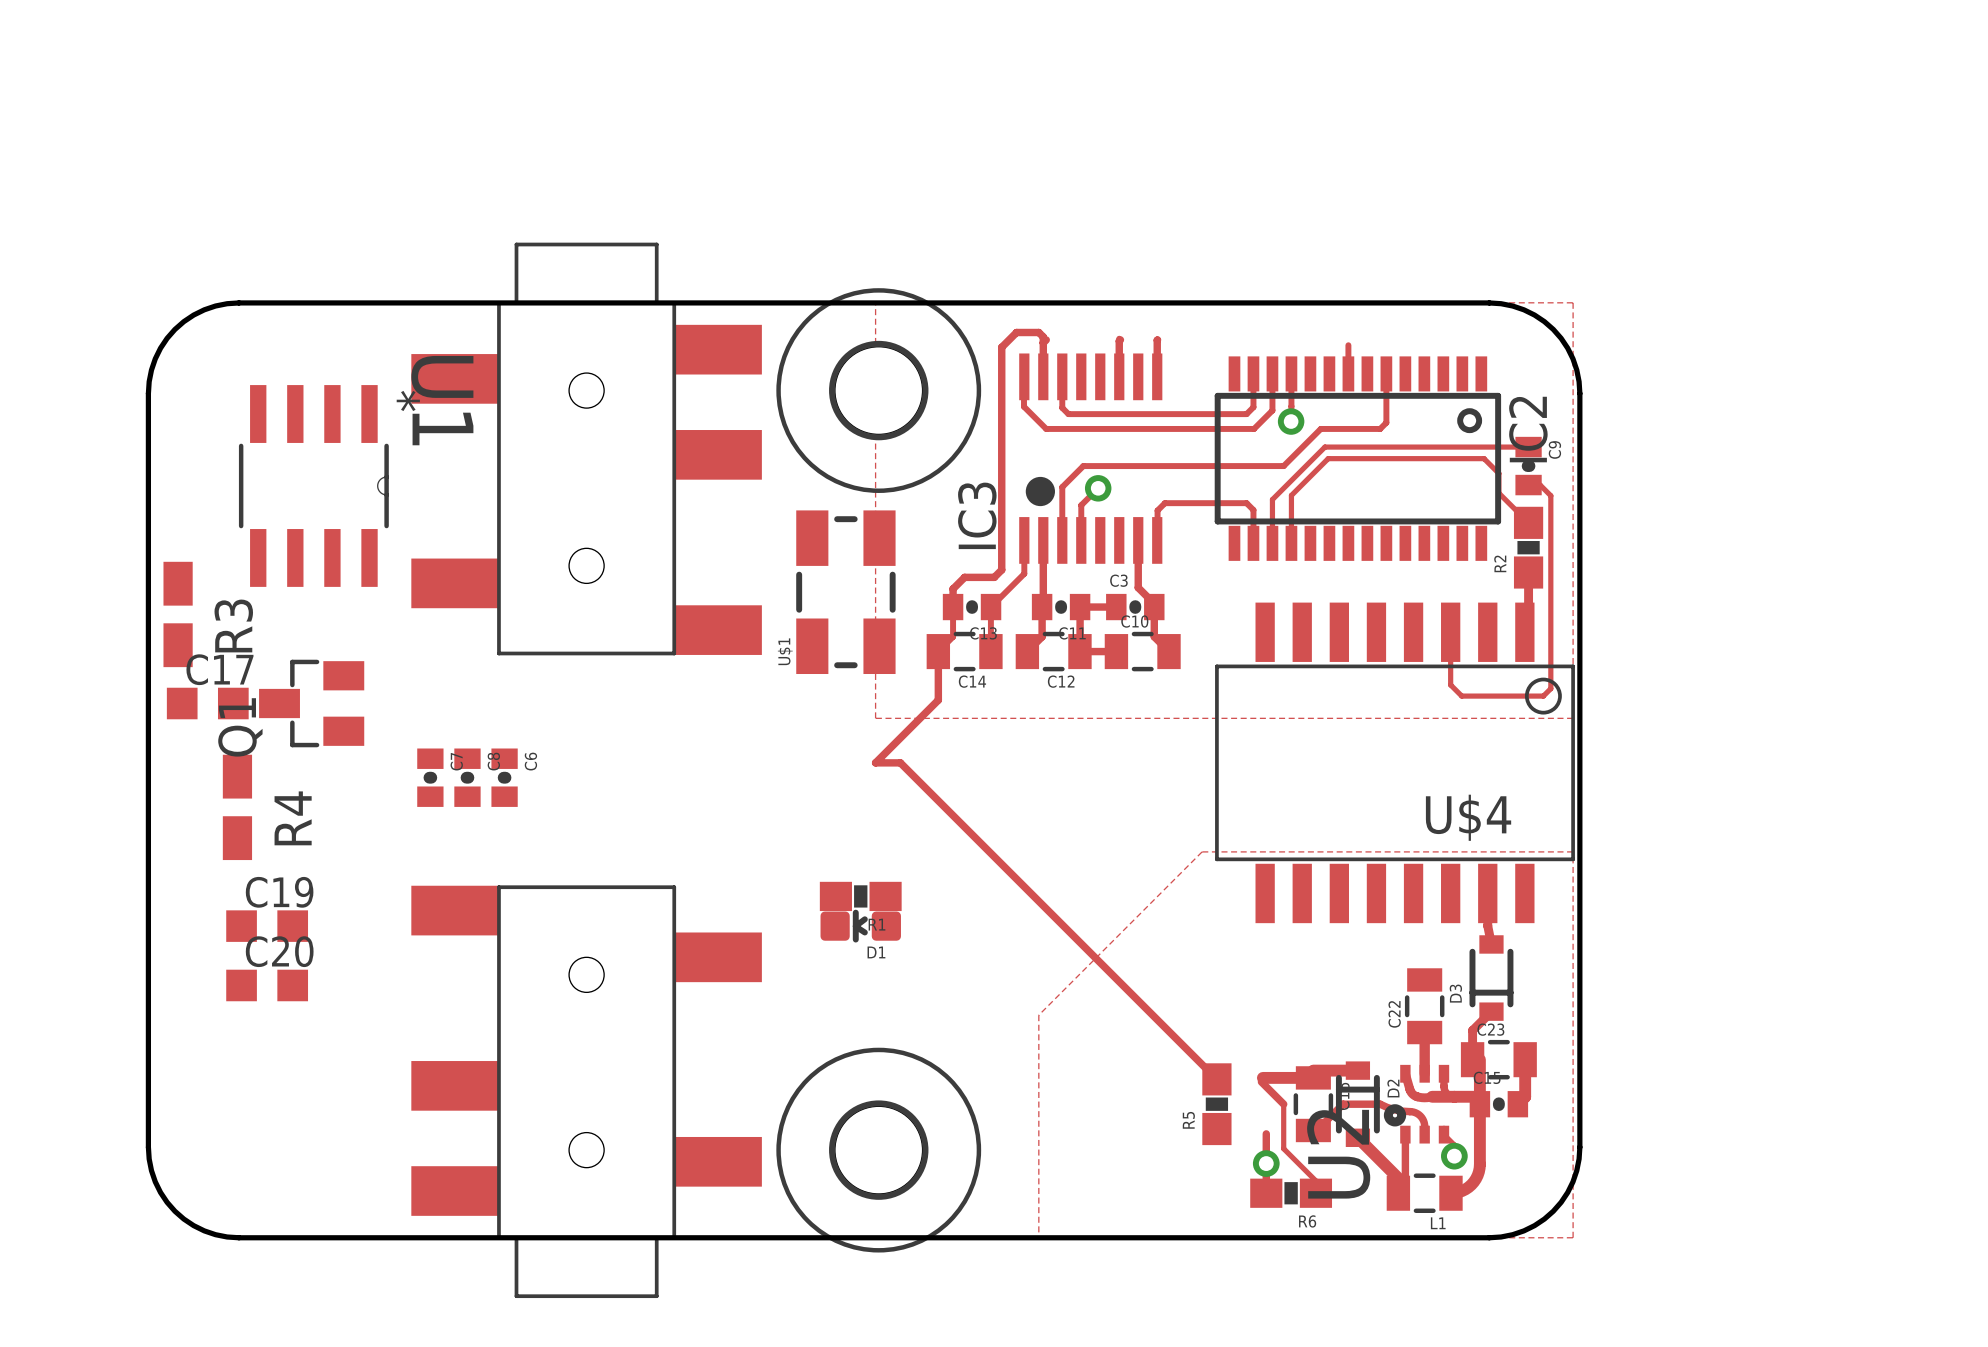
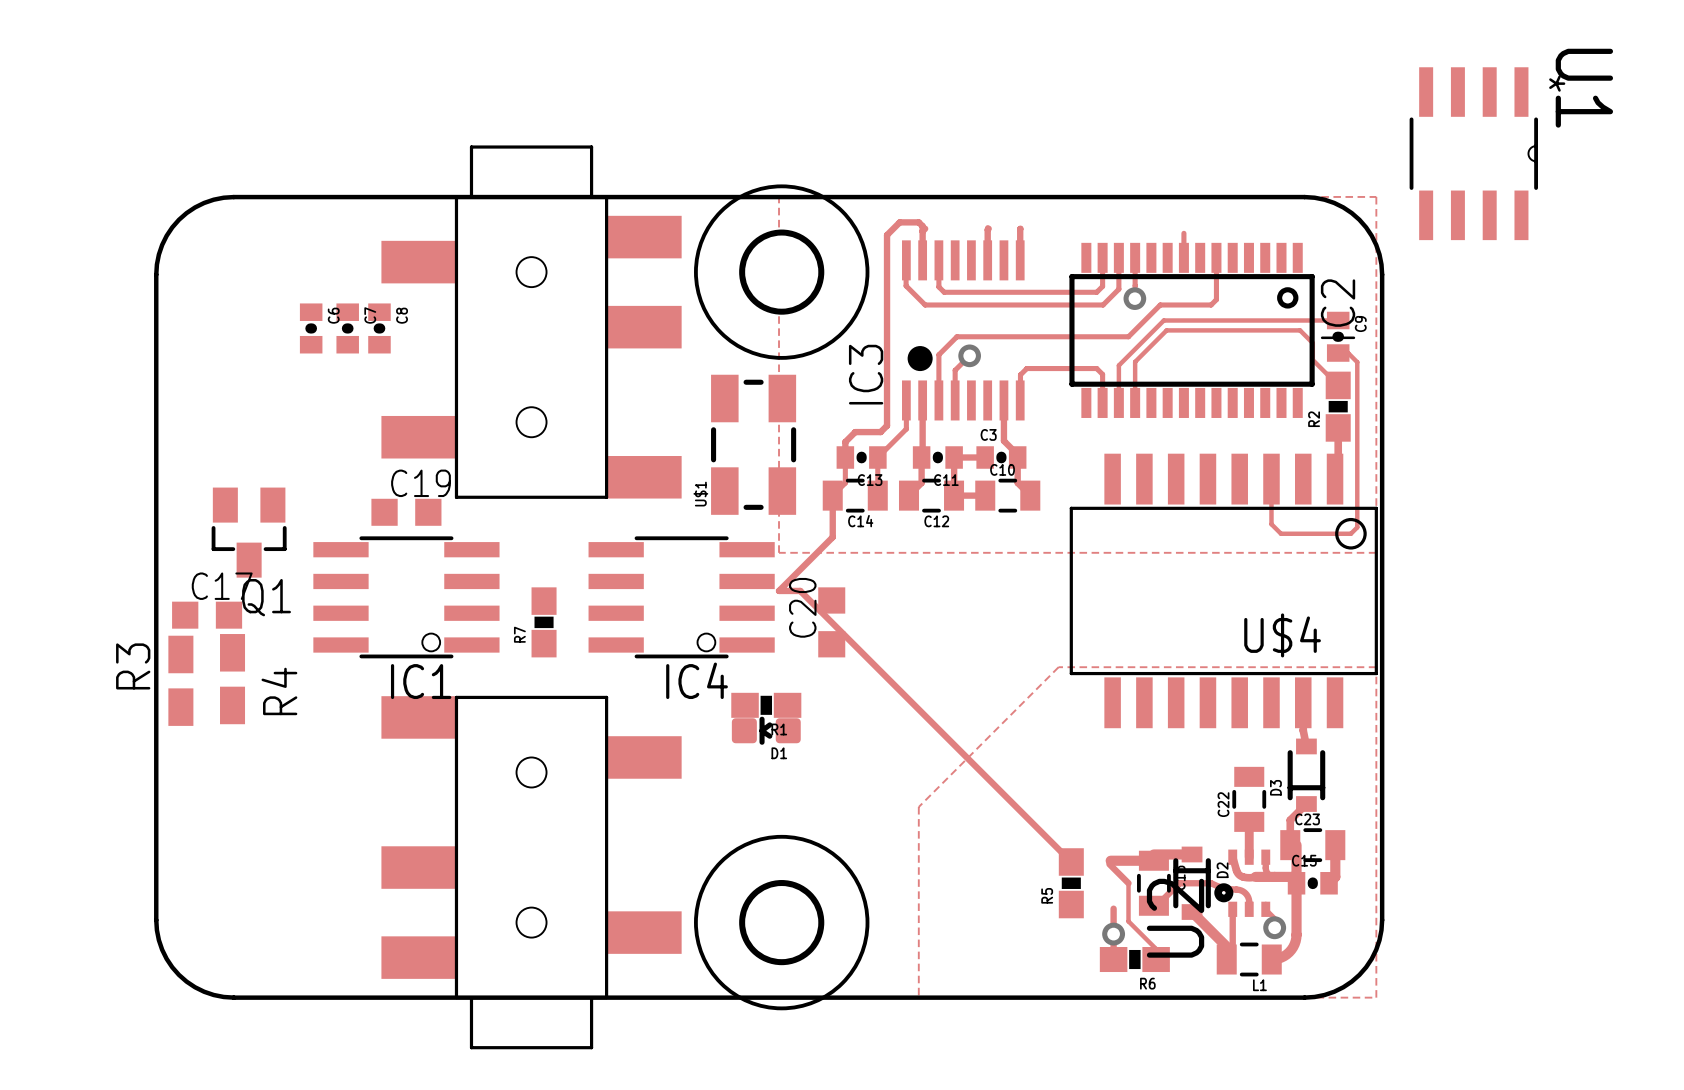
U1 position: (313, 485) -> (1473, 153)
R3 position: (178, 614) -> (180, 680)
R3 name position: R3 (233, 625) -> R3 (133, 666)
C17 position: (207, 703) -> (207, 615)
Q1 rotation: 0° (311, 703) -> 90° counterclockwise (249, 532)
IC1: none -> (406, 597)
IC4: none -> (681, 597)
C7 position: (430, 777) -> (347, 328)
C8 position: (467, 777) -> (379, 328)
C6 position: (504, 777) -> (311, 328)
R7: none -> (544, 622)
R4 position: (237, 807) -> (232, 679)
C19 position: (267, 926) -> (406, 512)
C20 rotation: 0° (267, 985) -> 90° clockwise (831, 622)
C20 position: (267, 985) -> (831, 622)

